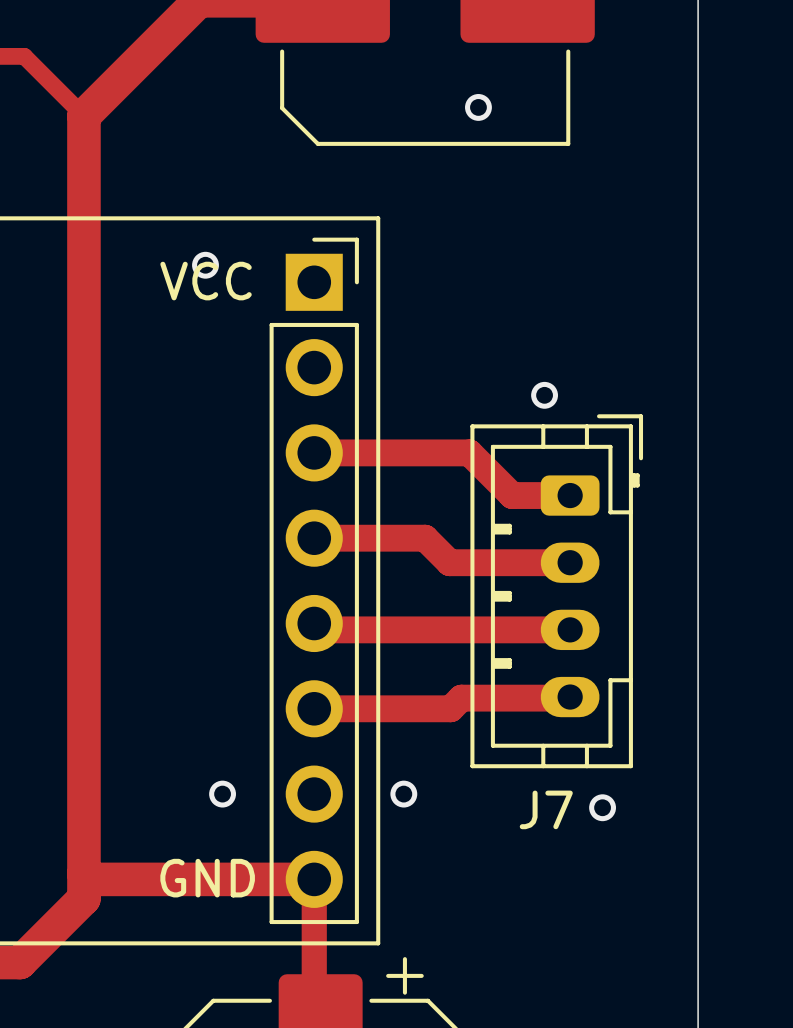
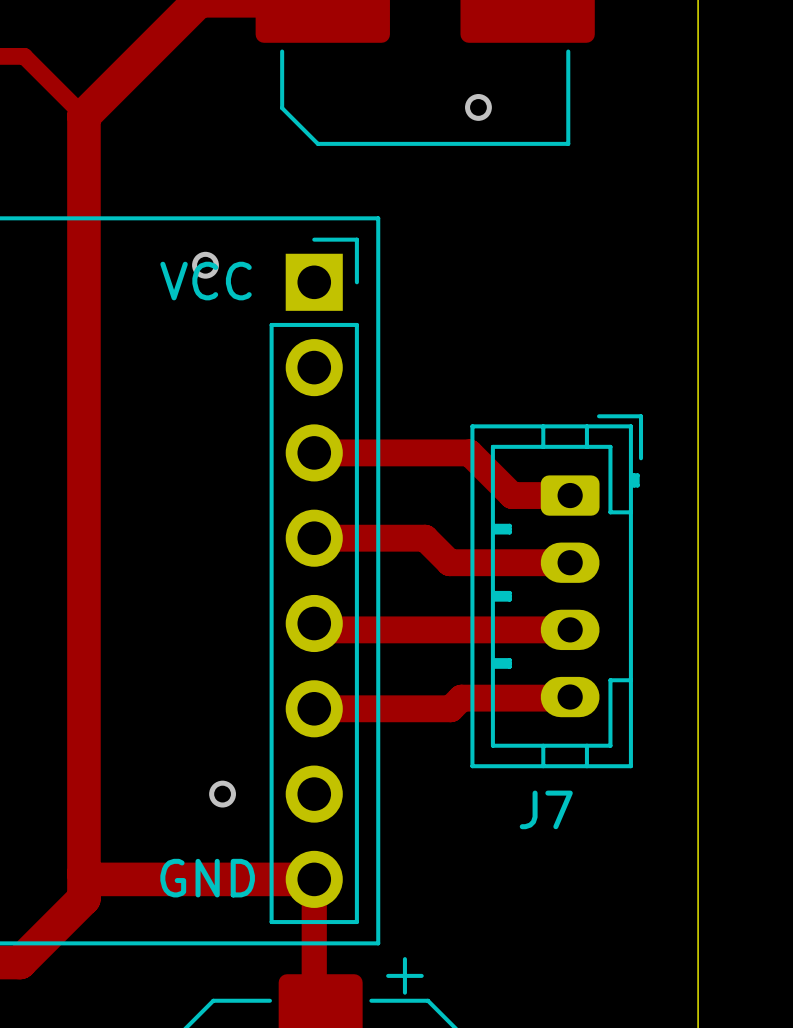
via: (544, 395) -> none
via: (403, 794) -> none
via: (602, 807) -> none

